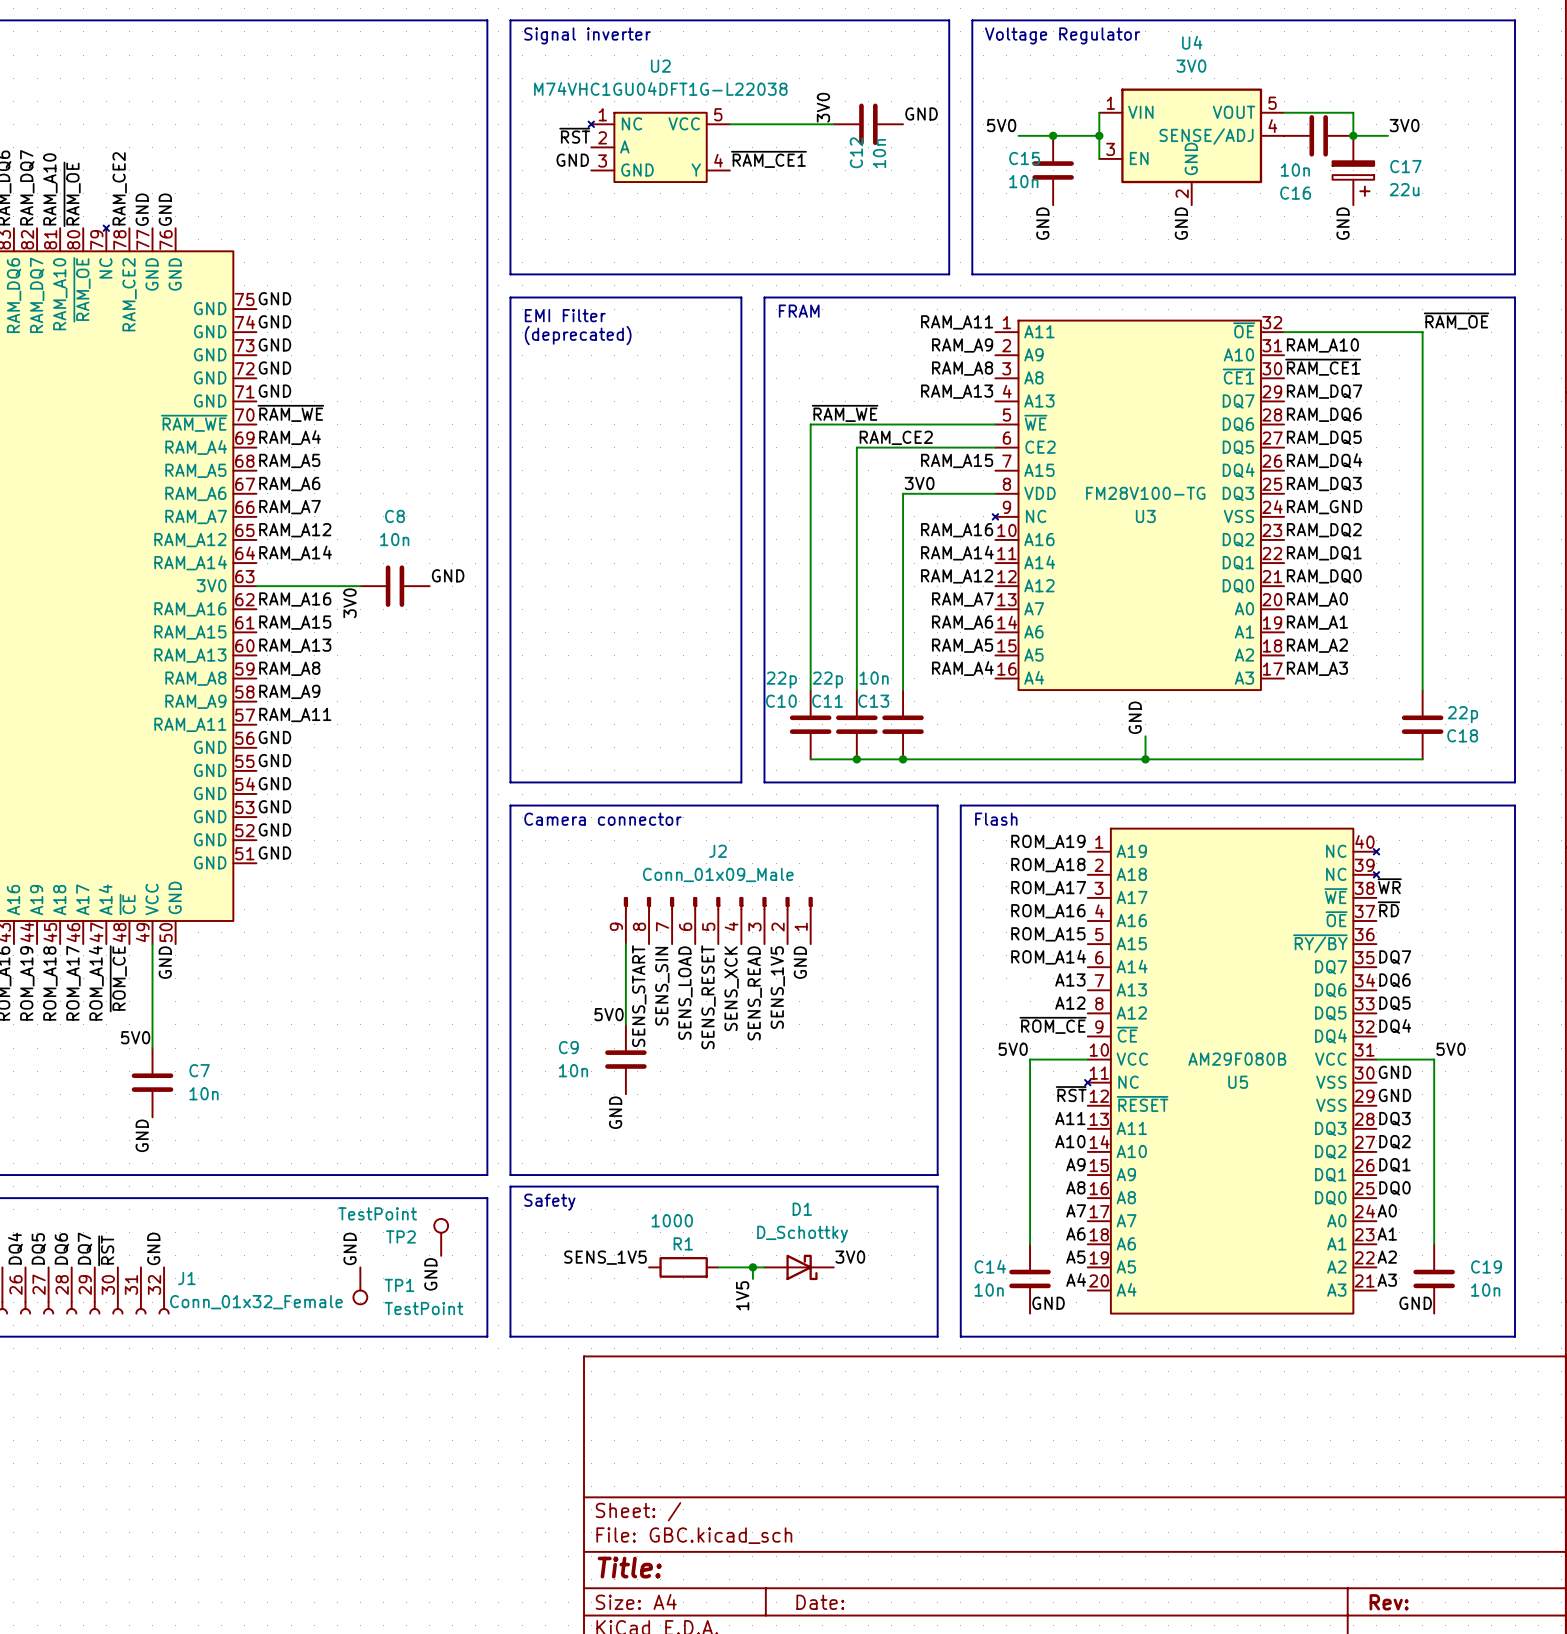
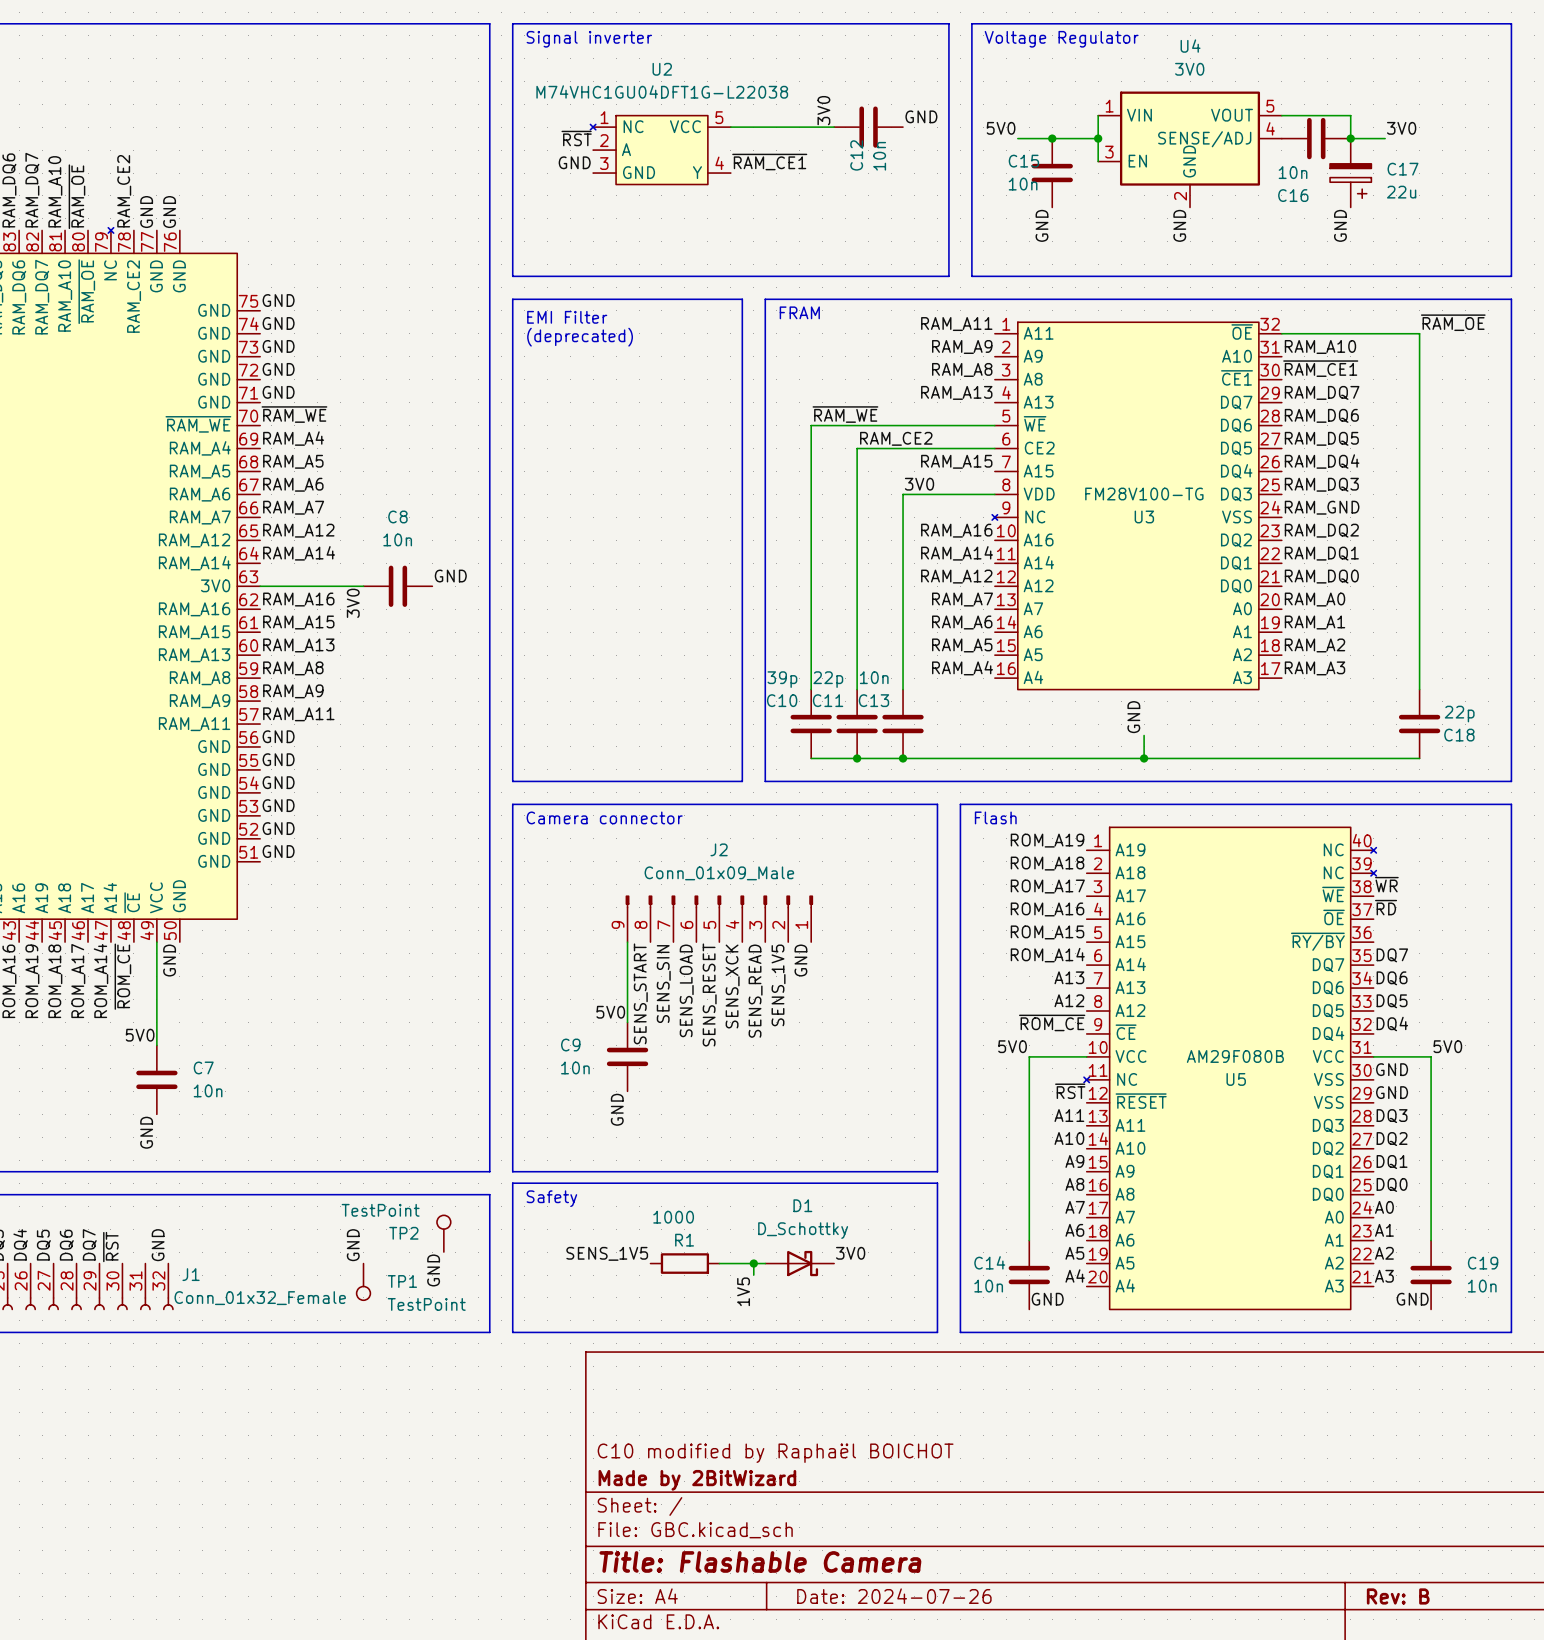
C10 value: 22p (781, 680) -> 39p (782, 679)
title block: none -> C10 modified by Raphaël BOICHOT (775, 1453)
title block: none -> Made by 2BitWizard (697, 1480)
title block: Title: (629, 1567) -> Title: Flashable Camera (760, 1561)
title block: Date: (820, 1602) -> Date: 2024-07-26 (894, 1596)
title block: Rev: (1389, 1602) -> Rev: B (1398, 1596)

